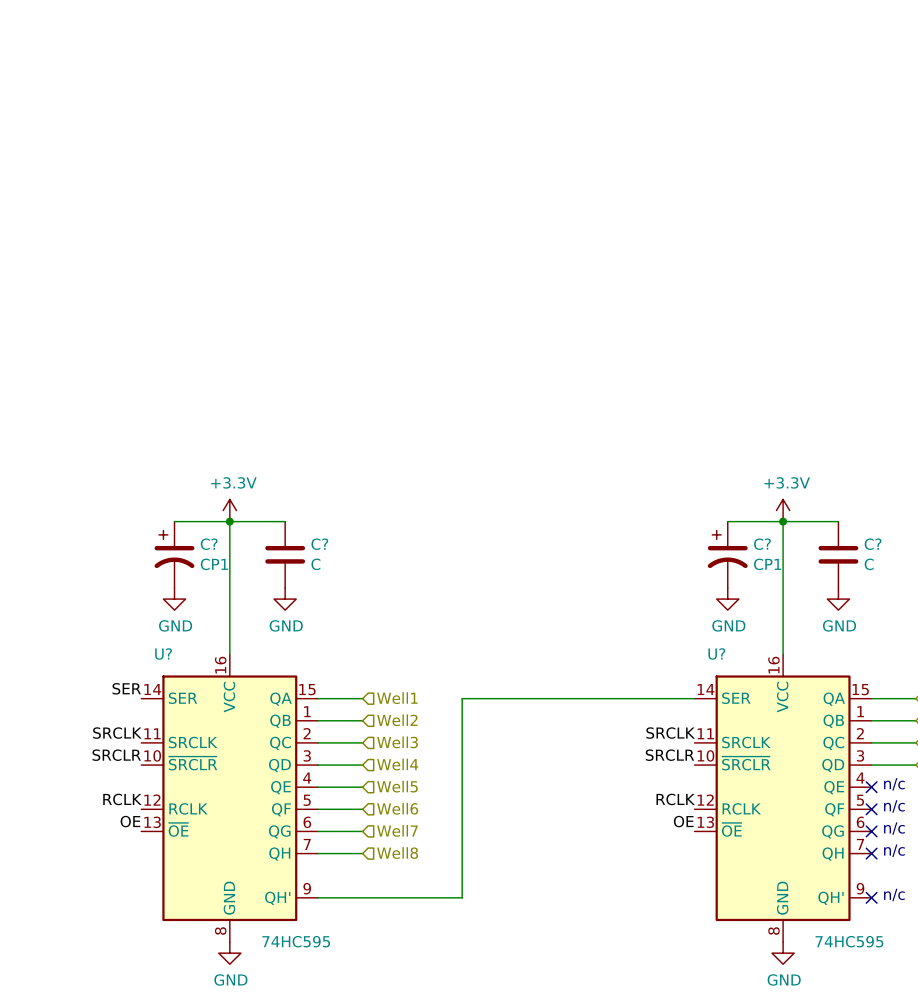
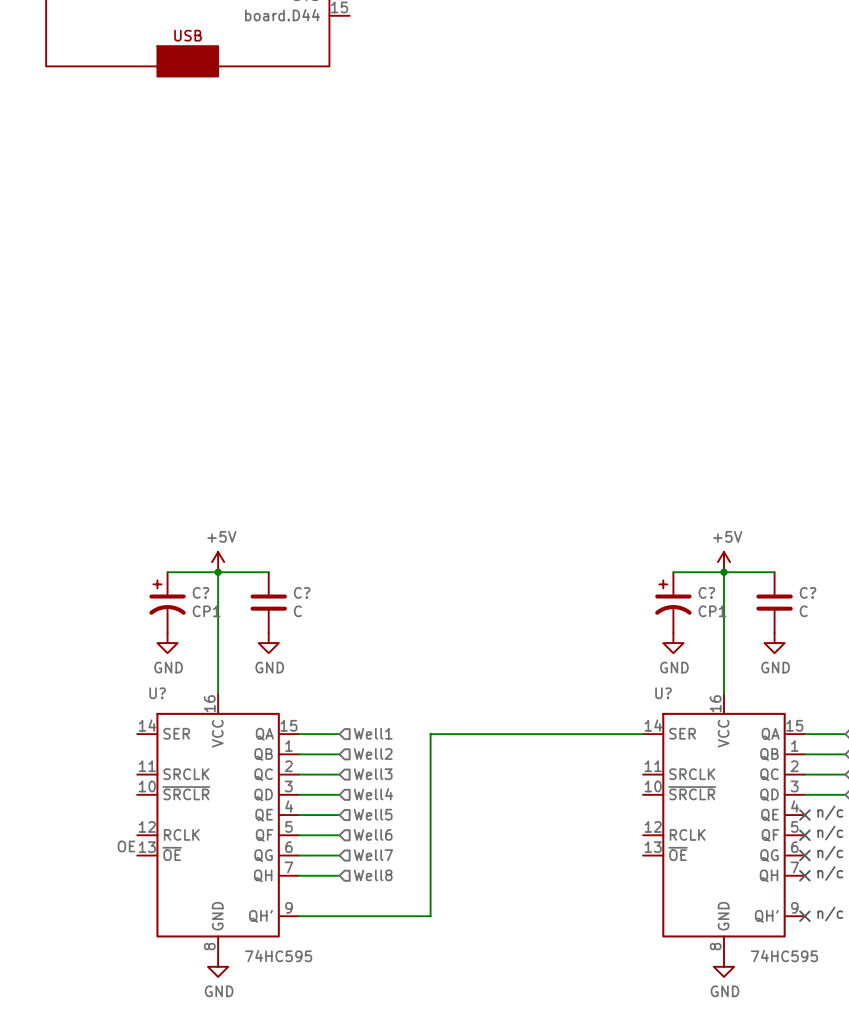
power symbol: +3.3V (229, 510) -> +5V (218, 562)
power symbol: +3.3V (783, 510) -> +5V (723, 562)
label: SER (126, 688) -> none
label: SRCLK (117, 733) -> none
label: SRCLK (670, 733) -> none
label: SRCLR (116, 755) -> none
label: SRCLR (669, 755) -> none
label: RCLK (122, 799) -> none
label: RCLK (675, 799) -> none
label: OE (683, 821) -> none

